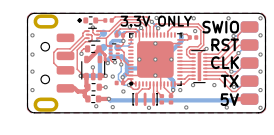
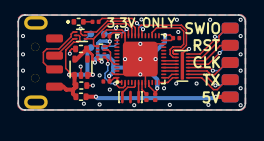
part footprint: [33, 14, 75, 112] -> [24, 16, 64, 109]

